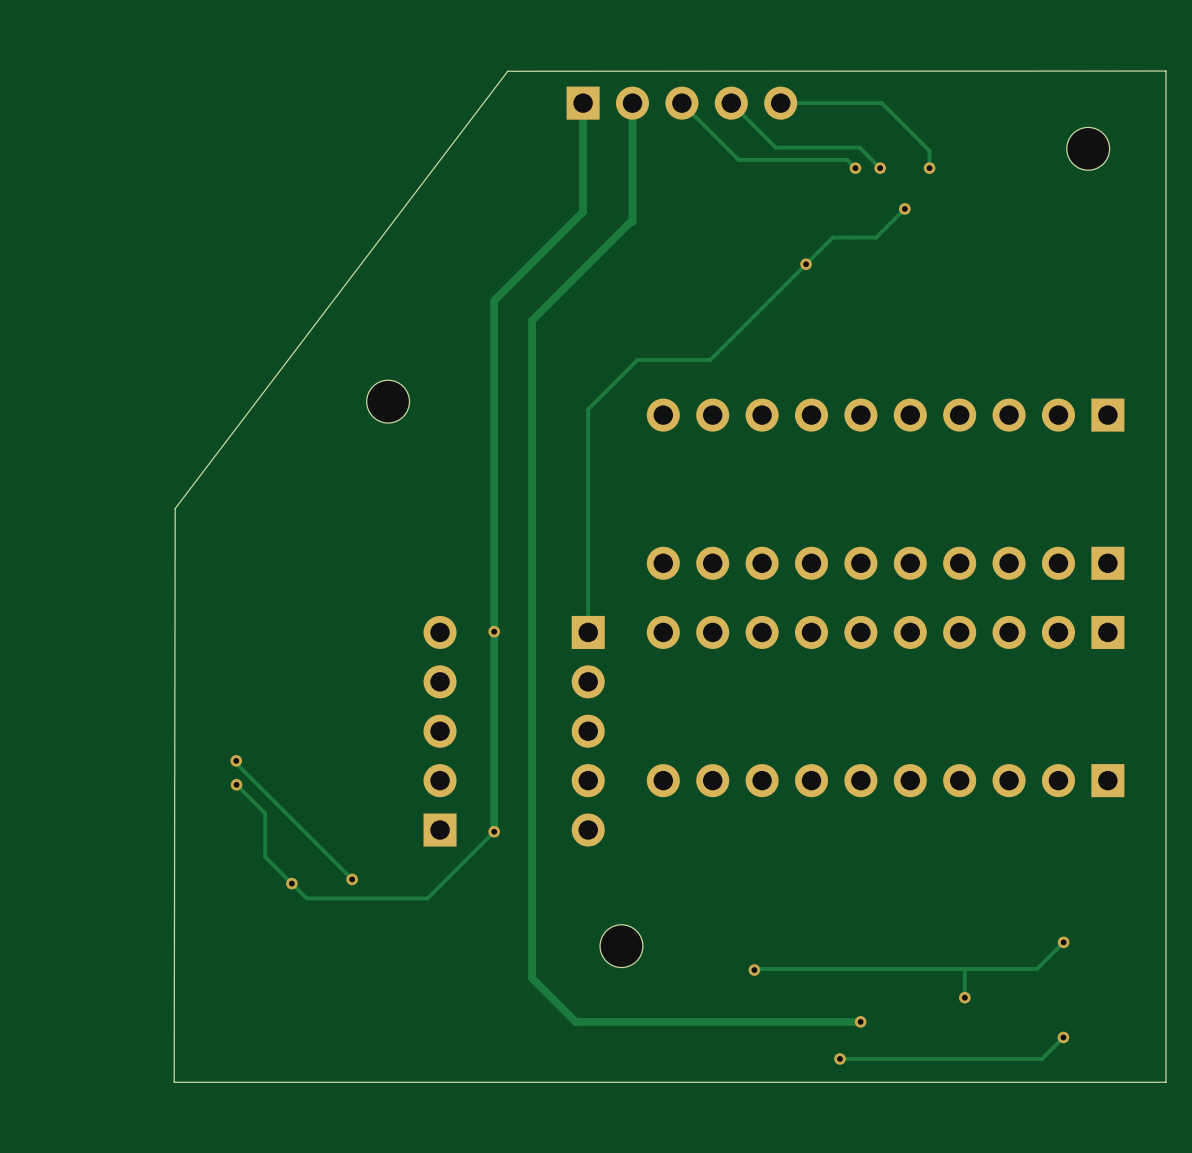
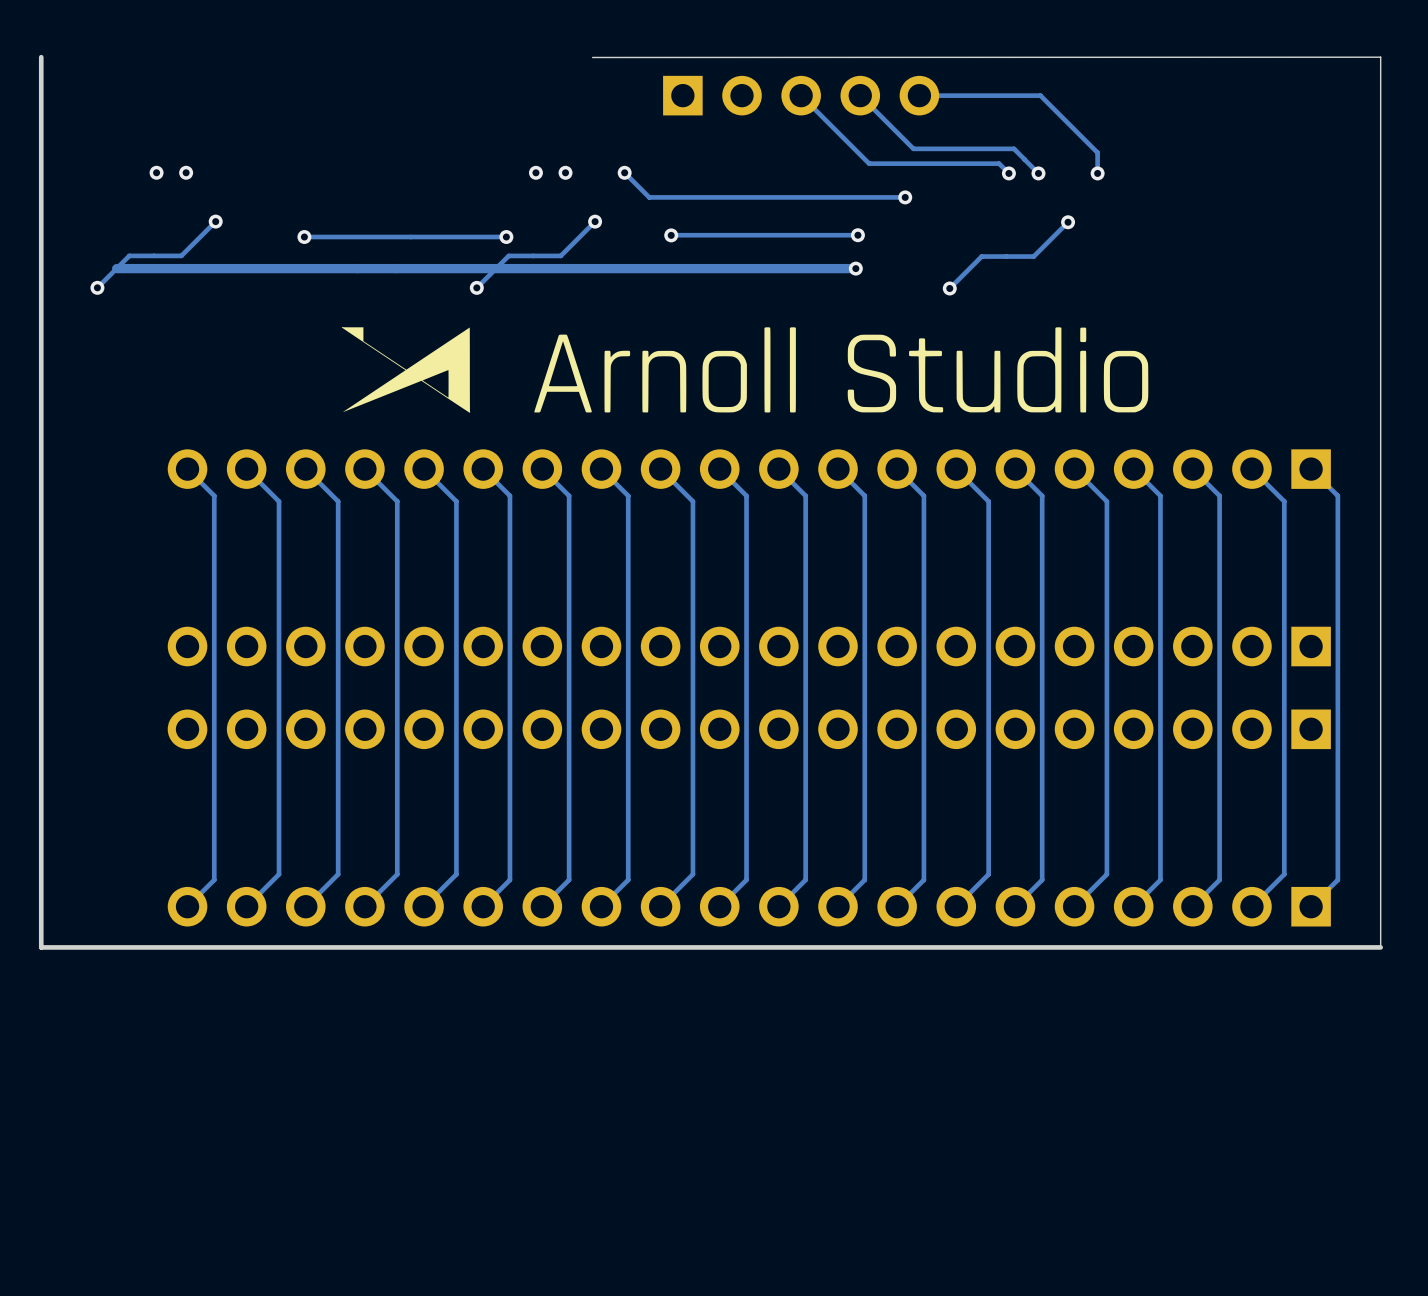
board edge: (507, 71) (175, 508) (174, 1082) (1165, 1082) (1165, 814) -> (41, 57) (41, 947) (1380, 947)
track: (583, 103) (583, 211) (494, 300) (494, 831) (427, 898) (306, 898) (265, 856) (265, 813) (236, 784) -> none
track: (632, 103) (632, 221) (532, 320) (532, 978) (575, 1021) (860, 1021) -> none
part: (1088, 148) -> none
via: none -> (156, 172)
via: none -> (186, 172)
via: none -> (535, 172)
via: none -> (565, 172)
track: none -> (624, 172) (649, 197) (905, 197)
via: none -> (624, 172)
via: none -> (905, 197)
track: none -> (215, 221) (181, 255) (129, 255) (97, 287)
via: none -> (215, 221)
track: none -> (595, 221) (560, 255) (508, 255) (476, 287)
via: none -> (595, 221)
via: none -> (671, 235)
track: none -> (857, 235) (671, 235)
via: none -> (857, 235)
via: none -> (304, 237)
track: none -> (506, 237) (304, 237)
via: none -> (506, 237)
track: none -> (855, 268) (116, 268)
via: none -> (855, 268)
via: none -> (97, 287)
via: none -> (476, 287)
track: (806, 264) (710, 360) (637, 360) (588, 409) (588, 632) -> none
drawing: none -> [341, 326, 1149, 413]
part: (388, 401) -> none
track: none -> (187, 469) (214, 495) (214, 879) (187, 906)
track: none -> (246, 469) (279, 501) (279, 874) (246, 906)
track: none -> (305, 469) (338, 501) (338, 874) (305, 906)
track: none -> (364, 469) (397, 501) (397, 874) (364, 906)
track: none -> (424, 469) (456, 501) (456, 874) (424, 906)
track: none -> (483, 469) (509, 495) (509, 879) (483, 906)
track: none -> (542, 469) (569, 495) (569, 879) (542, 906)
track: none -> (601, 469) (628, 495) (628, 879) (601, 906)
track: none -> (660, 469) (692, 501) (692, 874) (660, 906)
track: none -> (719, 469) (746, 495) (746, 879) (719, 906)
part: none -> (749, 469)
track: none -> (778, 469) (805, 495) (805, 879) (778, 906)
track: none -> (838, 469) (864, 495) (864, 879) (838, 906)
track: none -> (897, 469) (923, 495) (923, 879) (897, 906)
track: none -> (956, 469) (988, 501) (988, 874) (956, 906)
track: none -> (1015, 469) (1042, 495) (1042, 879) (1015, 906)
part: (885, 415) -> none
track: none -> (1074, 469) (1106, 501) (1106, 874) (1074, 906)
track: none -> (1133, 469) (1160, 495) (1160, 879) (1133, 906)
track: none -> (1192, 469) (1219, 495) (1219, 879) (1192, 906)
track: none -> (1251, 469) (1284, 501) (1284, 874) (1251, 906)
track: none -> (1311, 469) (1337, 495) (1337, 879) (1311, 906)
part: none -> (749, 646)
via: (494, 631) -> none
part: none -> (749, 729)
part: (440, 731) -> none
part: (588, 731) -> none
track: (236, 760) (236, 763) (352, 879) -> none
via: (236, 760) -> none
part: none -> (749, 906)
part: (885, 780) -> none
via: (236, 784) -> none
via: (494, 831) -> none
via: (352, 879) -> none
via: (291, 883) -> none
track: (1063, 942) (1036, 969) (754, 970) -> none
via: (1063, 942) -> none
part: (621, 946) -> none
track: (964, 969) (964, 997) -> none
via: (754, 970) -> none
via: (964, 997) -> none
via: (860, 1021) -> none
track: (1063, 1037) (1041, 1058) (839, 1058) -> none
via: (1063, 1037) -> none
via: (839, 1058) -> none

